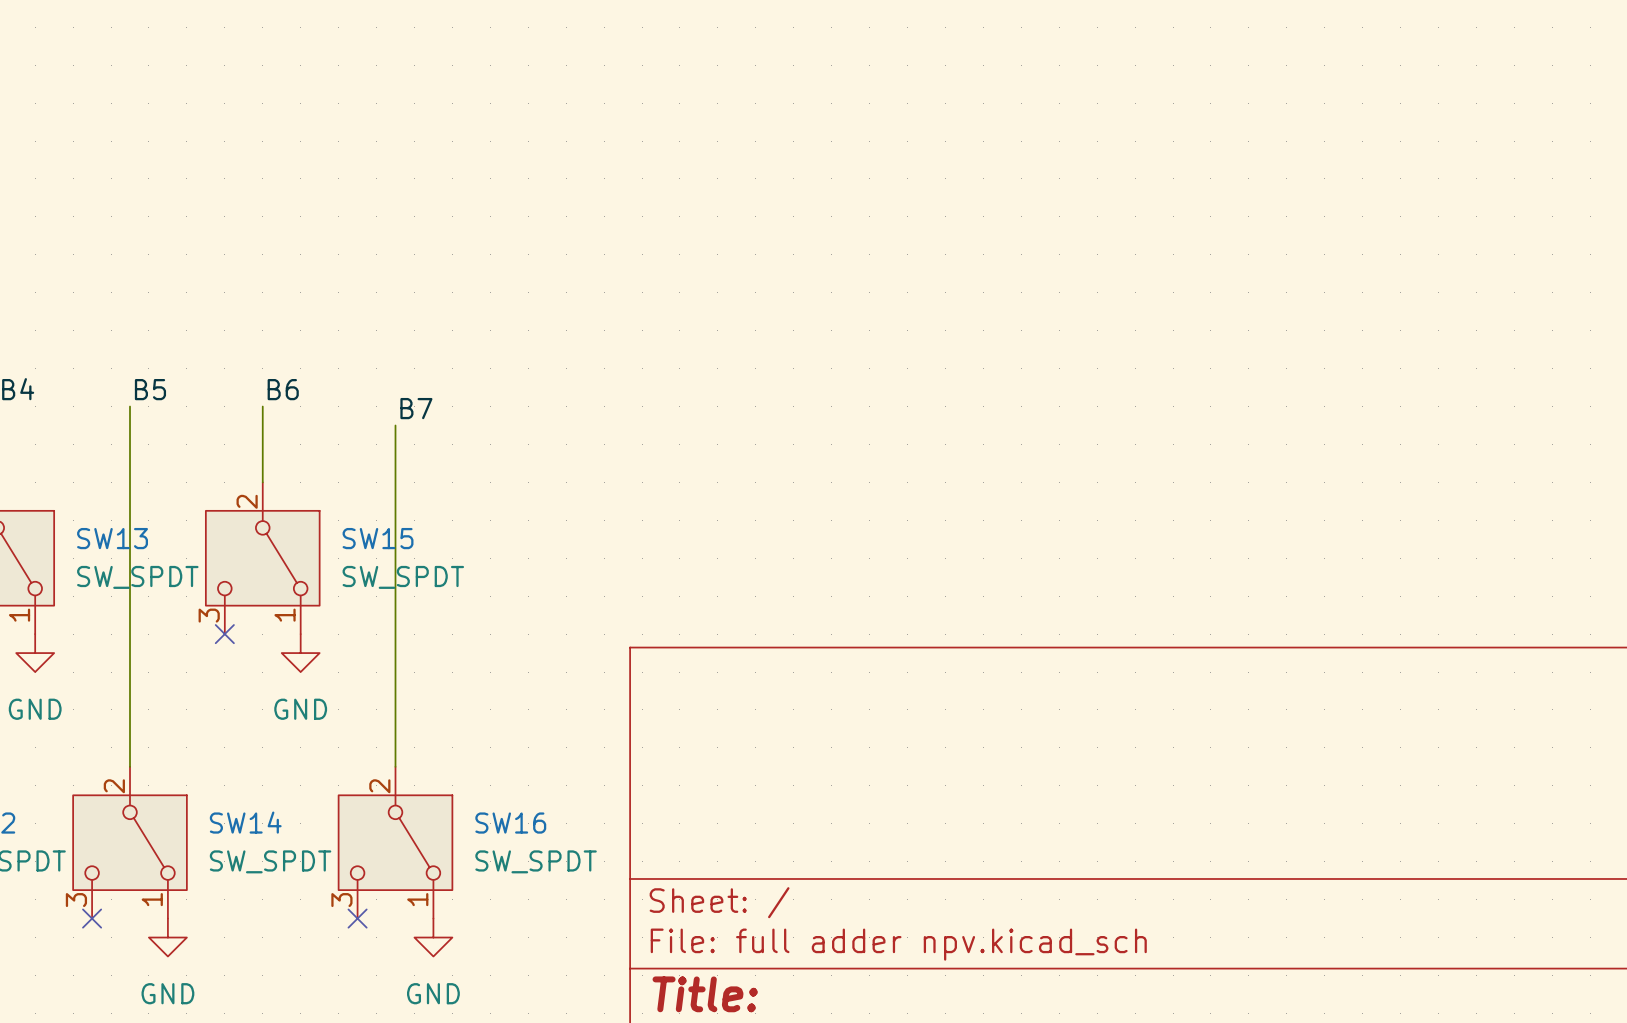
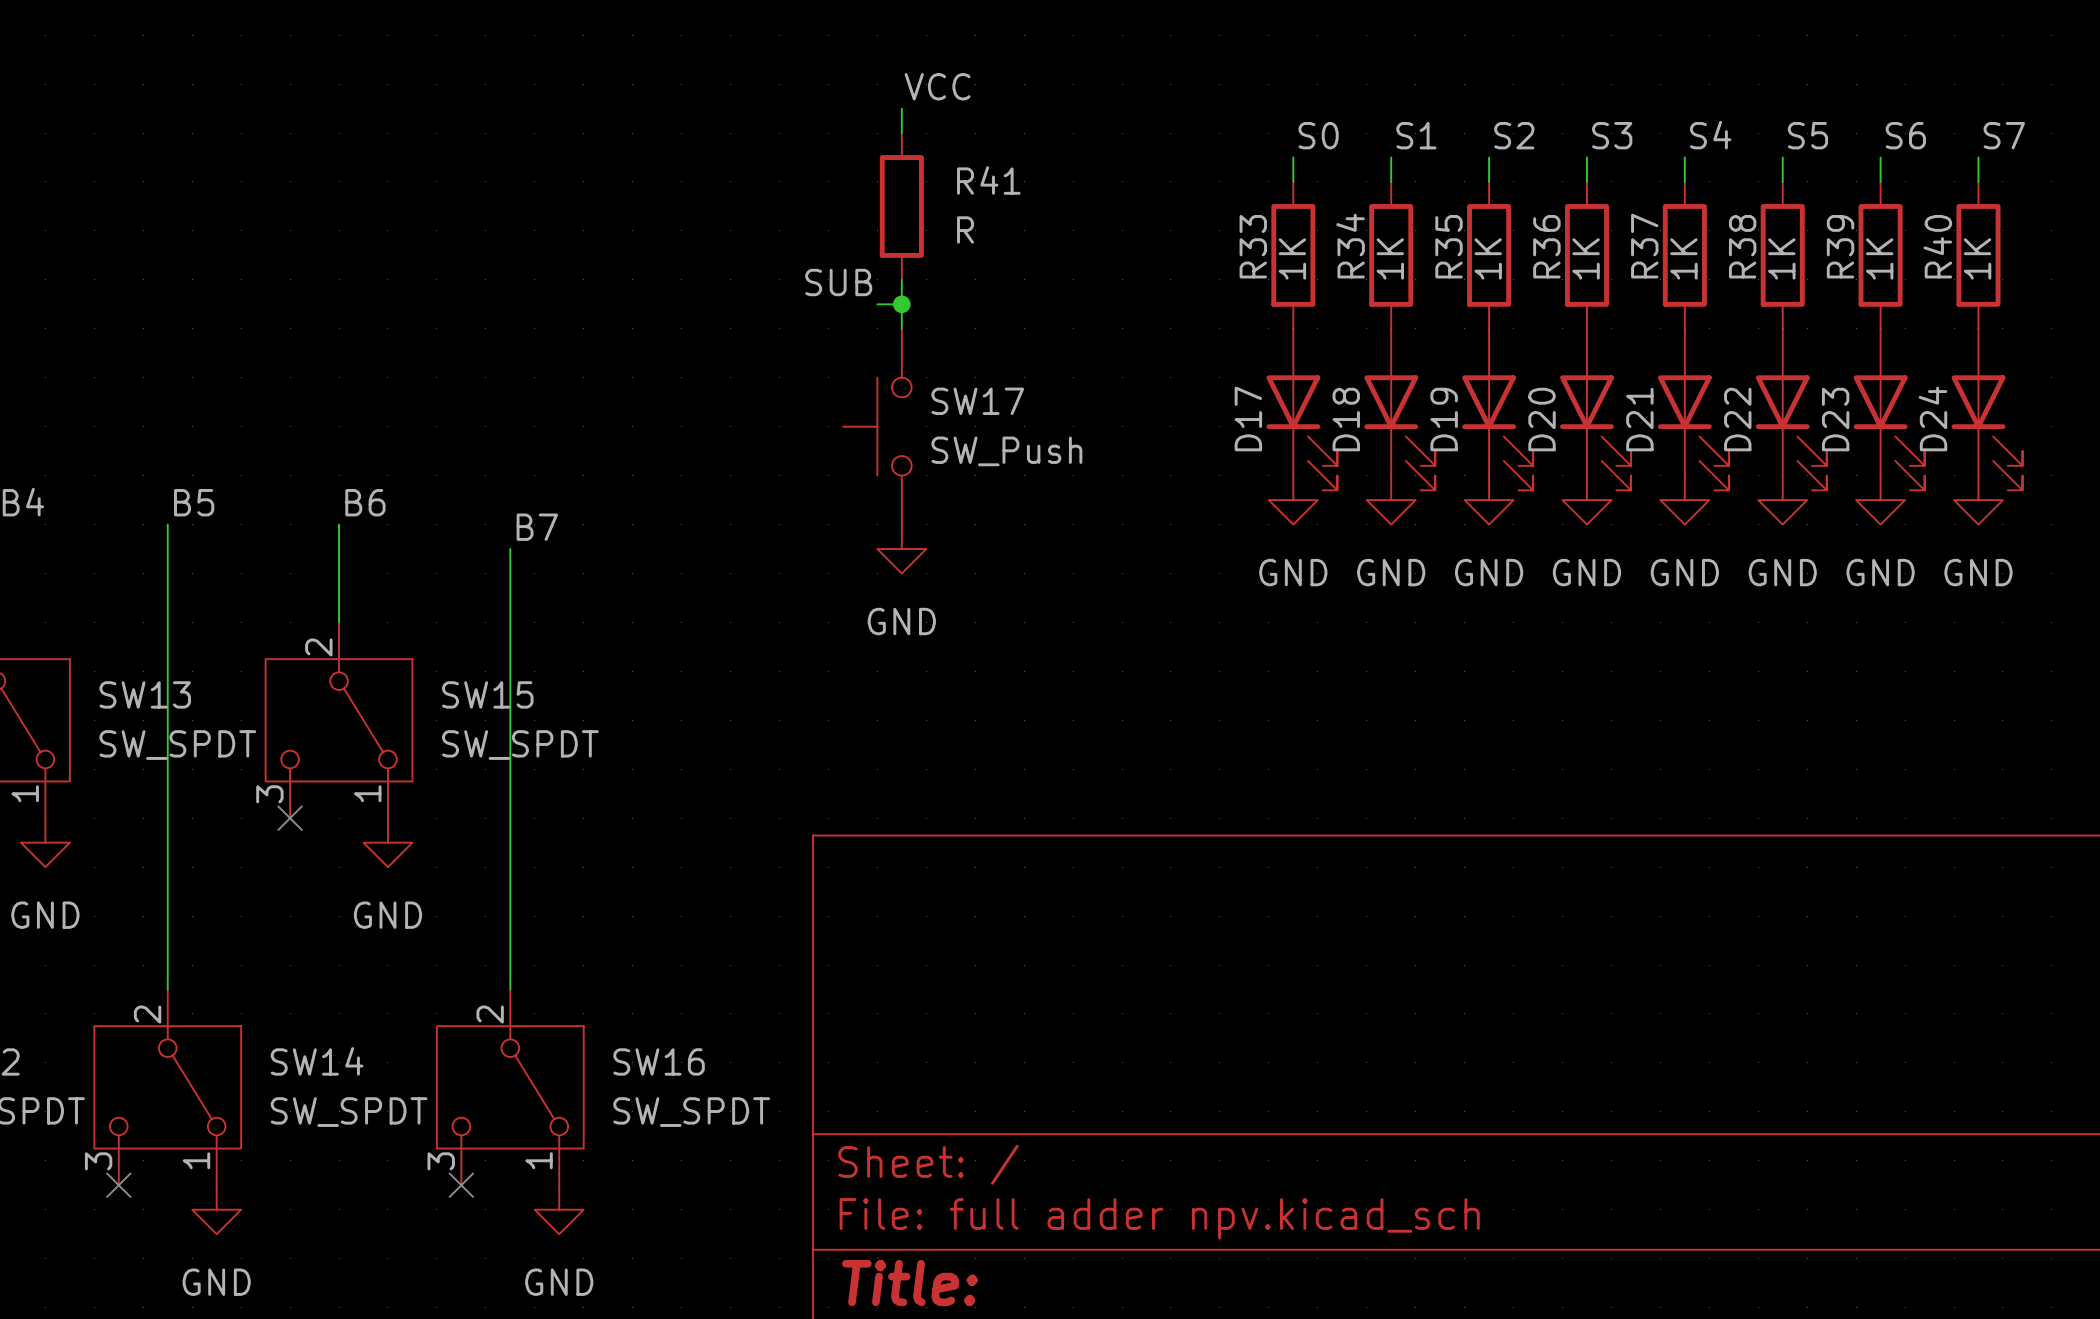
label: none -> VCC (937, 86)
wire: none -> (901, 108) (901, 133)
label: none -> S4 (1710, 135)
label: none -> S0 (1318, 135)
label: none -> S1 (1416, 135)
label: none -> S2 (1514, 135)
label: none -> S3 (1612, 135)
label: none -> S5 (1807, 135)
label: none -> S6 (1905, 135)
label: none -> S7 (2004, 135)
wire: none -> (1293, 157) (1293, 181)
wire: none -> (1391, 157) (1391, 181)
wire: none -> (1489, 157) (1489, 181)
wire: none -> (1586, 157) (1586, 181)
wire: none -> (1684, 157) (1684, 181)
wire: none -> (1782, 157) (1782, 181)
wire: none -> (1880, 157) (1880, 181)
wire: none -> (1978, 157) (1978, 181)
R41: none -> R (901, 206)
R33: none -> 1K (1293, 255)
R34: none -> 1K (1391, 255)
R35: none -> 1K (1489, 255)
R36: none -> 1K (1586, 255)
R37: none -> 1K (1684, 255)
R38: none -> 1K (1782, 255)
R39: none -> 1K (1880, 255)
R40: none -> 1K (1978, 255)
wire: none -> (901, 279) (901, 328)
label: none -> SUB (838, 282)
wire: none -> (877, 304) (901, 304)
junction: none -> (901, 304)
D17: none -> (1301, 409)
D18: none -> (1399, 409)
D19: none -> (1497, 409)
D20: none -> (1595, 409)
D21: none -> (1693, 409)
D22: none -> (1791, 409)
D23: none -> (1889, 409)
D24: none -> (1987, 409)
SW17: none -> SW_Push (877, 426)
power symbol: none -> GND (1293, 500)
power symbol: none -> GND (1391, 500)
power symbol: none -> GND (1489, 500)
power symbol: none -> GND (1586, 500)
power symbol: none -> GND (1684, 500)
power symbol: none -> GND (1782, 500)
power symbol: none -> GND (1880, 500)
power symbol: none -> GND (1978, 500)
power symbol: none -> GND (901, 549)

